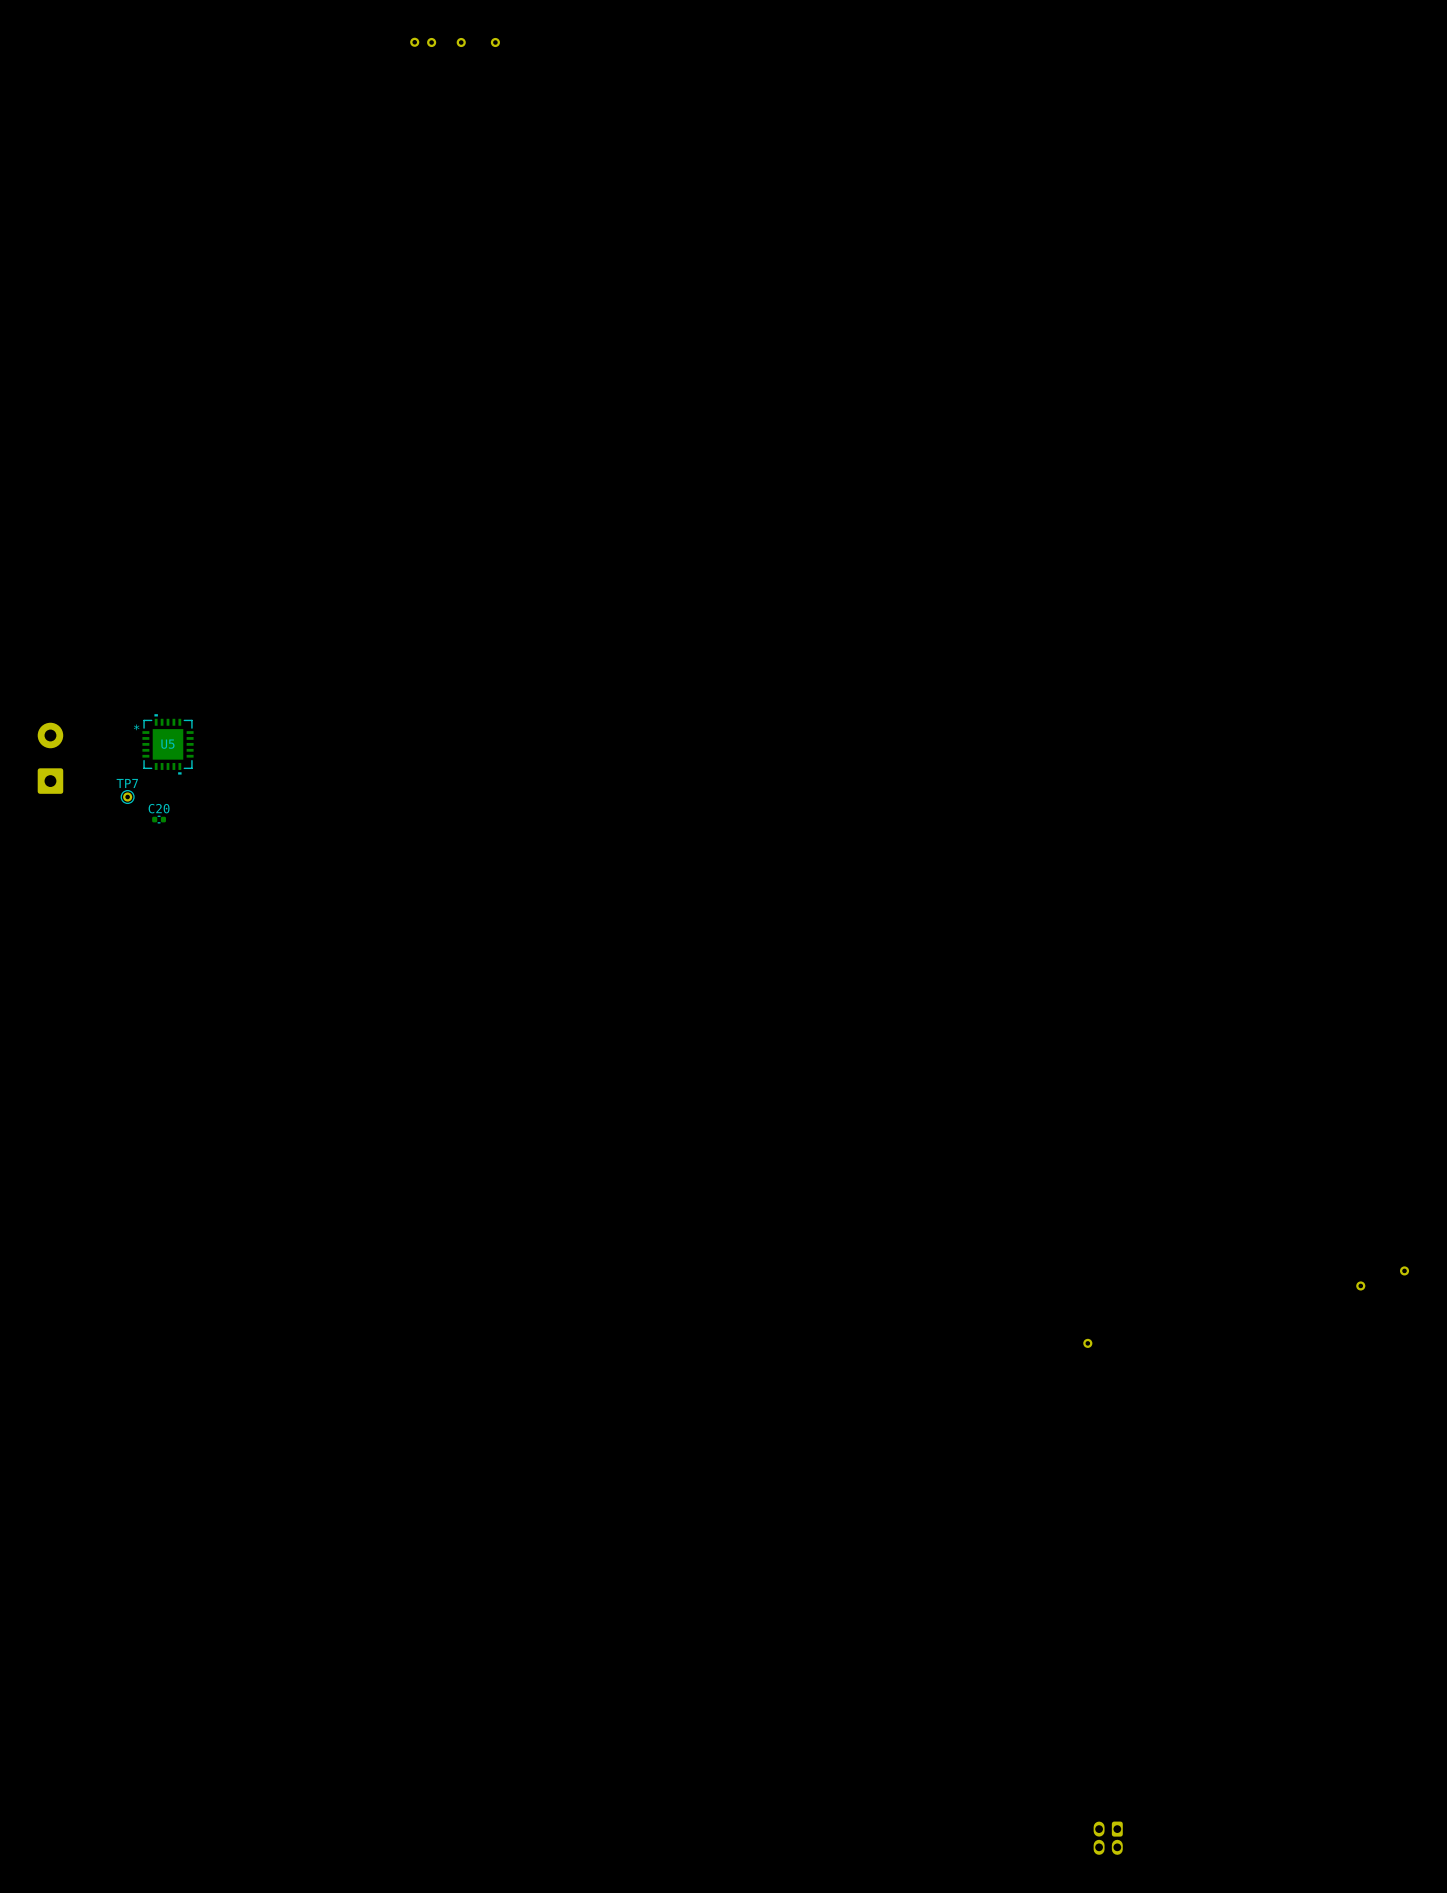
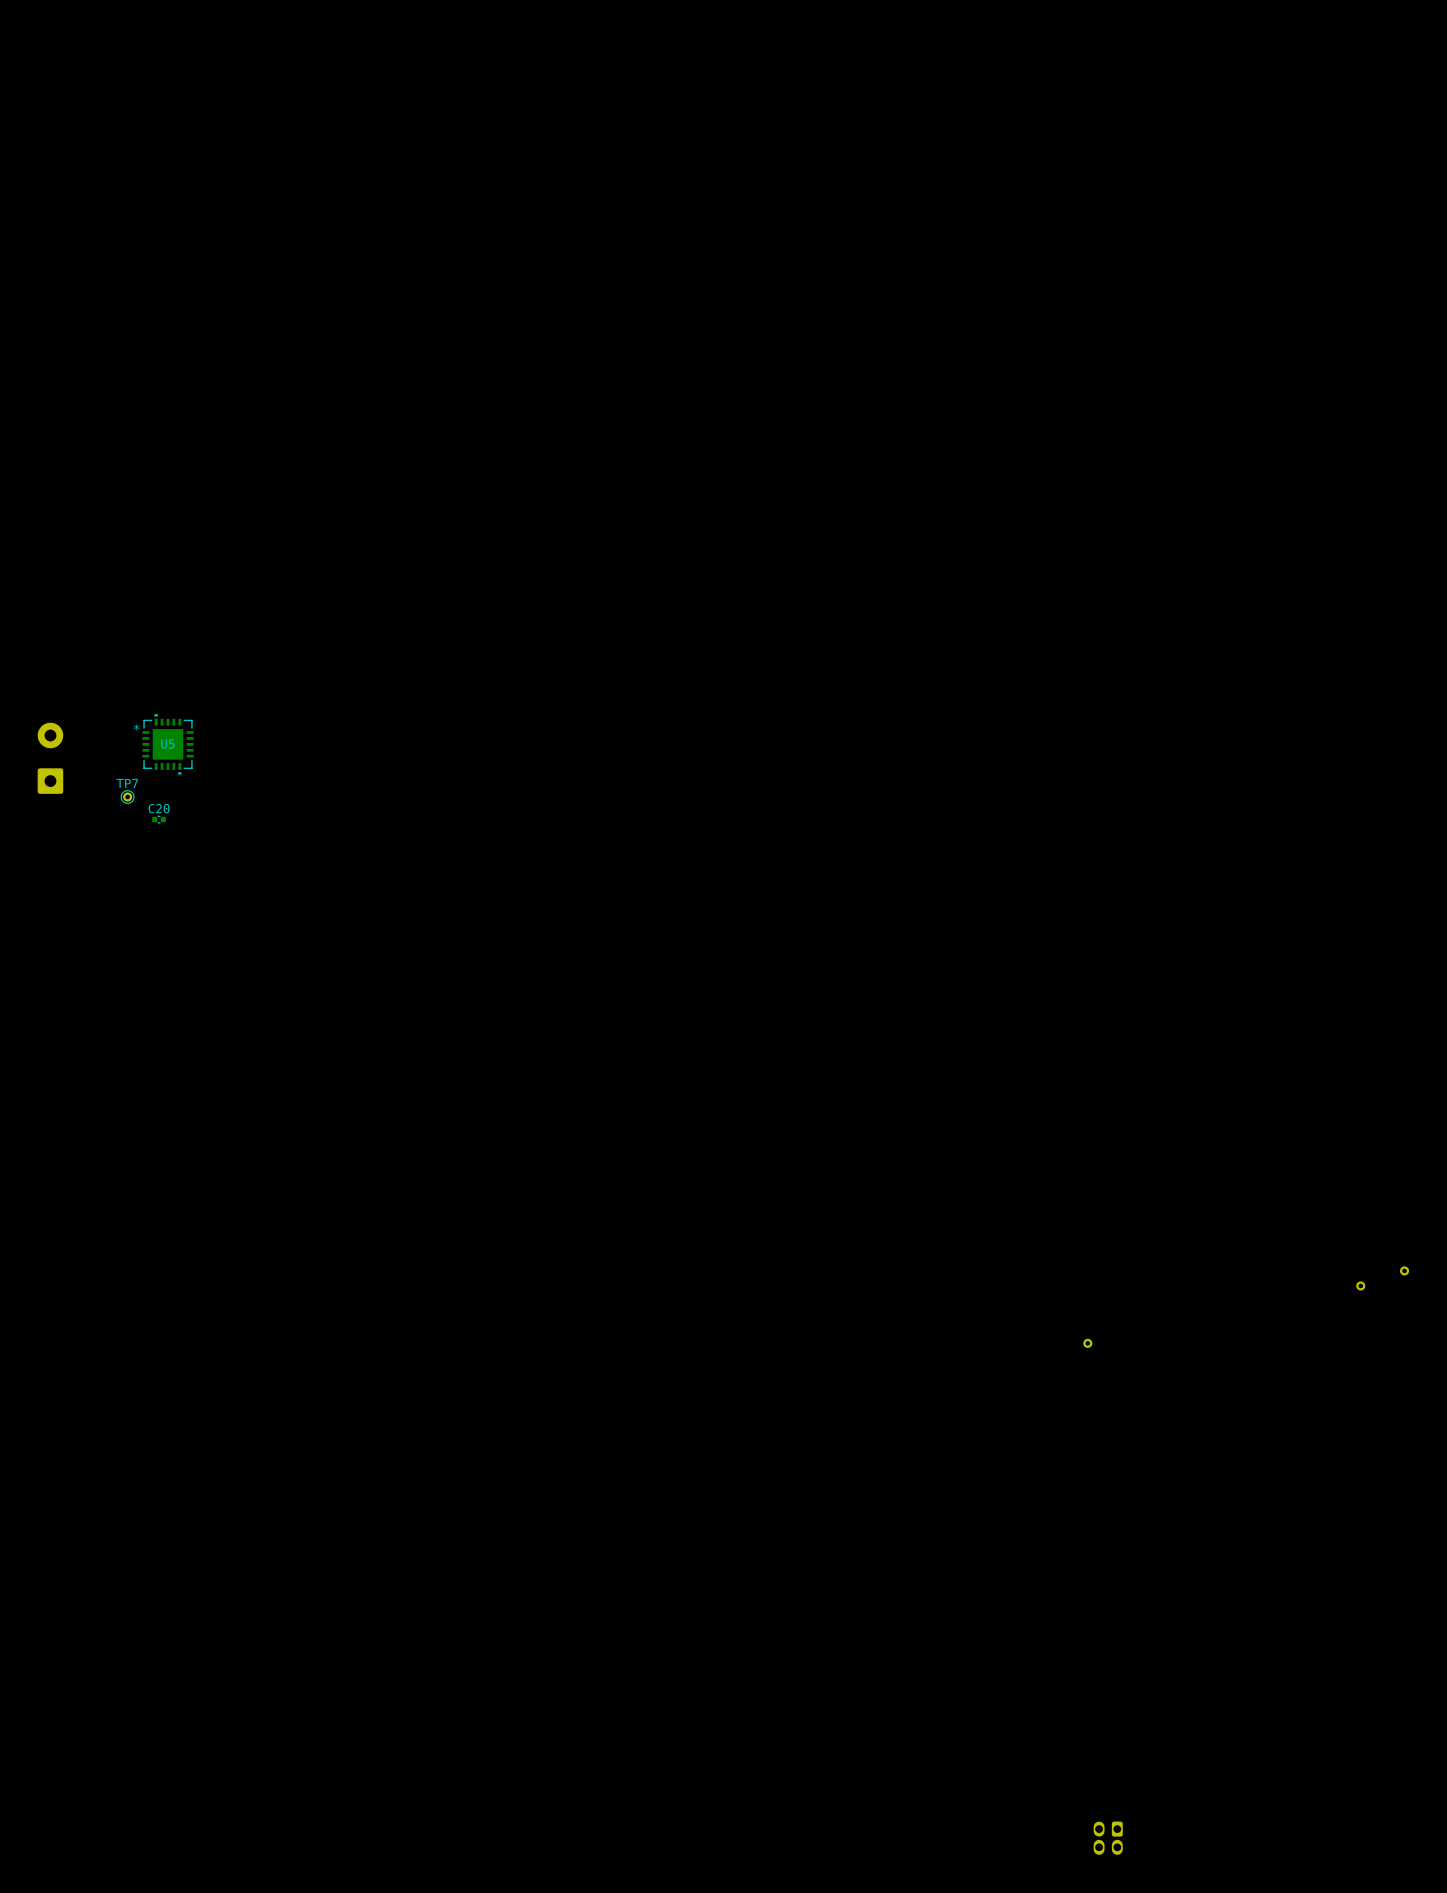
part: (414, 42) -> none
part: (431, 42) -> none
part: (461, 42) -> none
part: (495, 42) -> none

